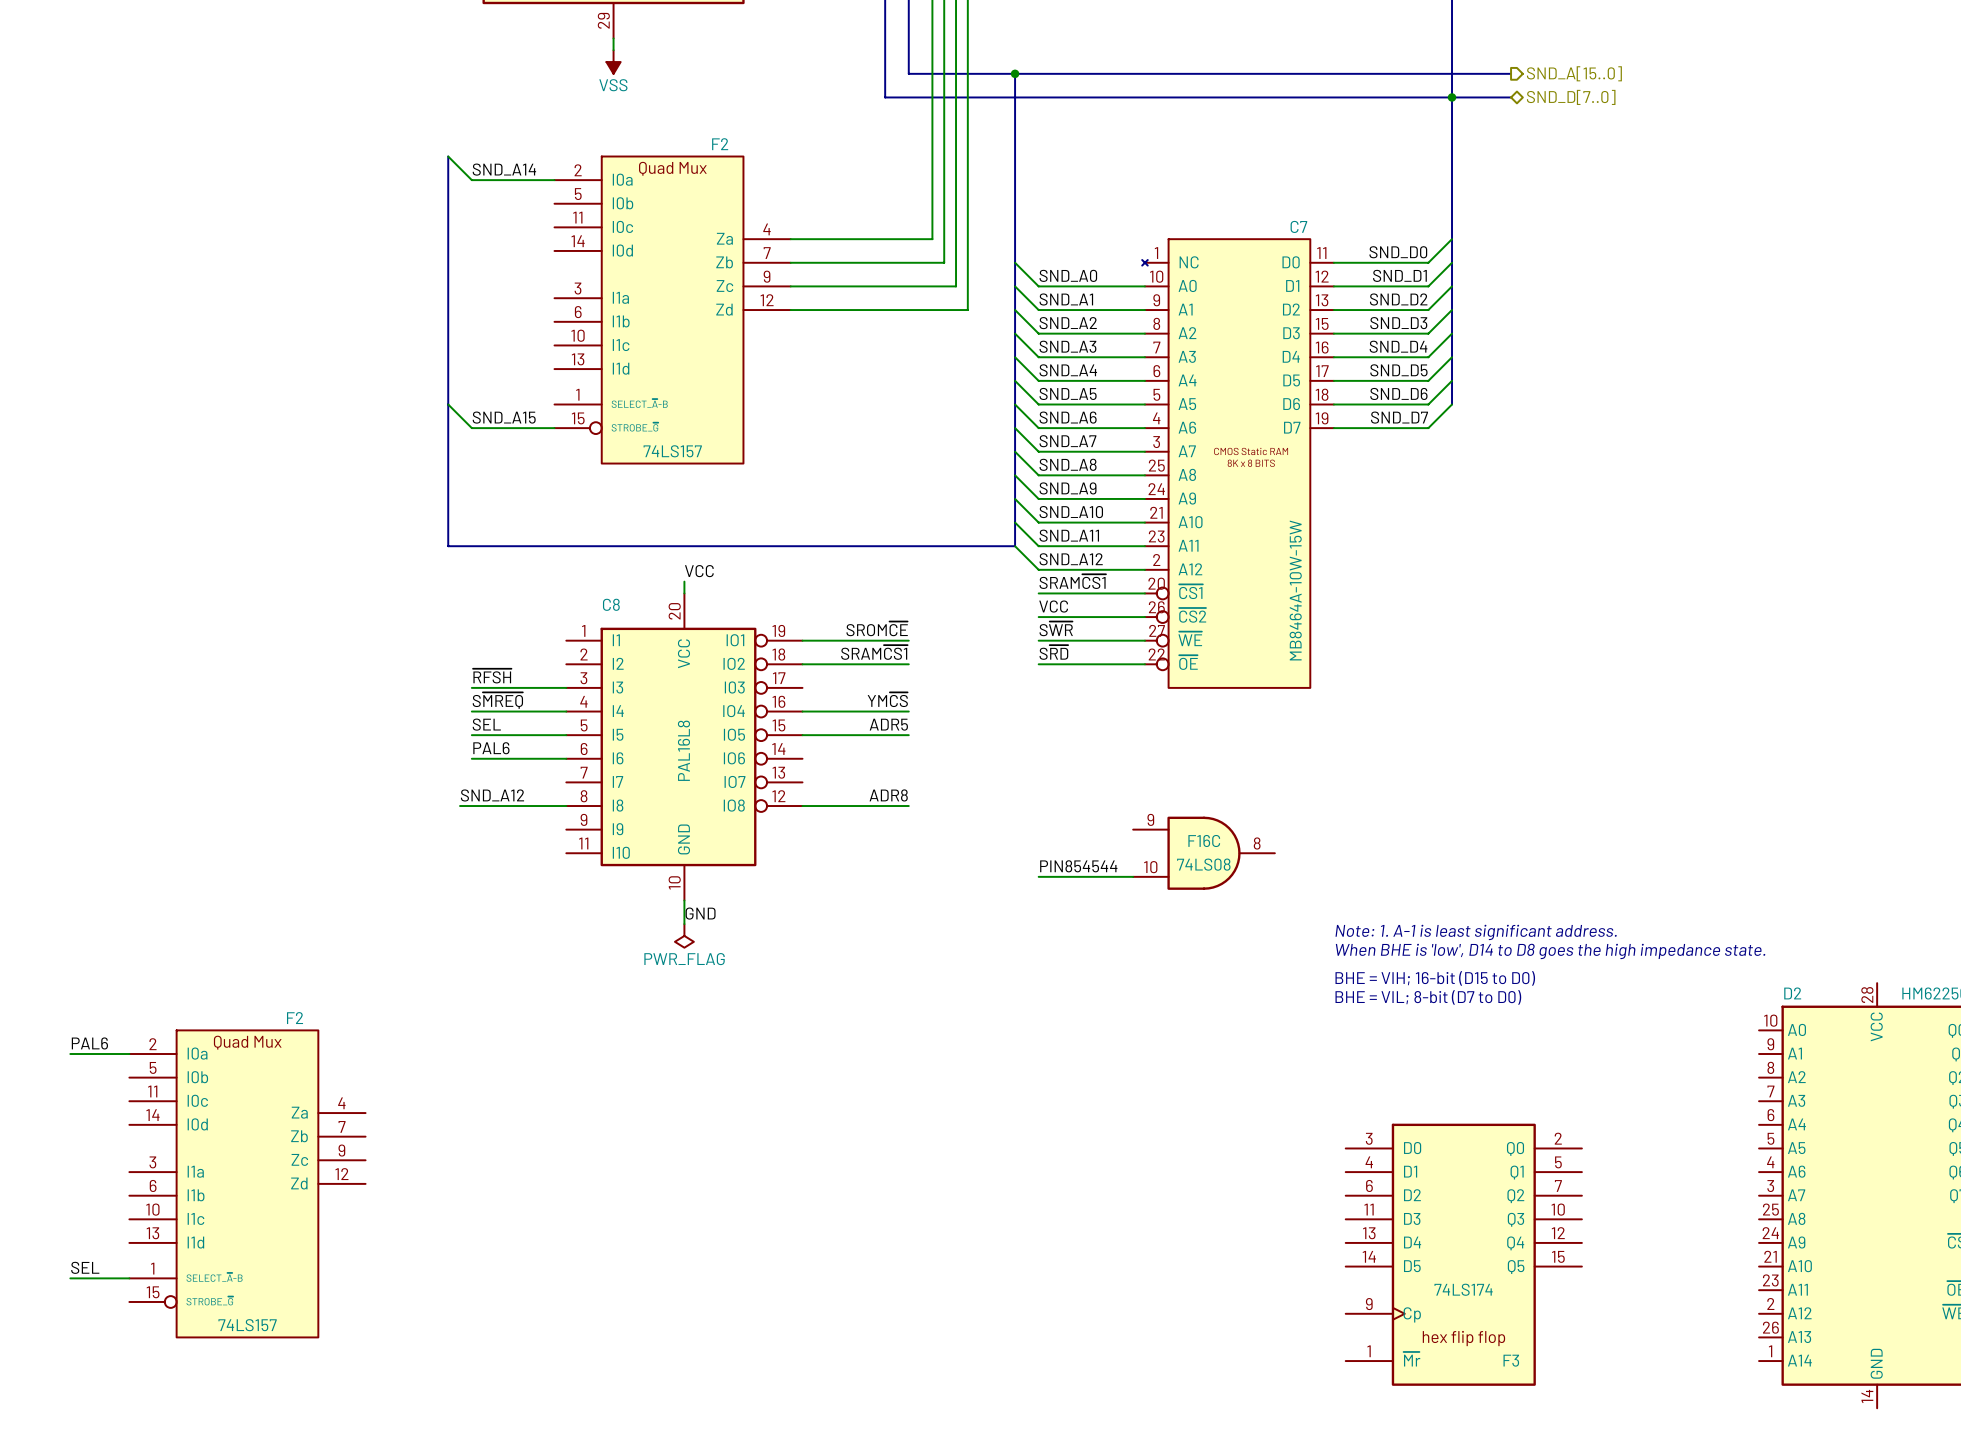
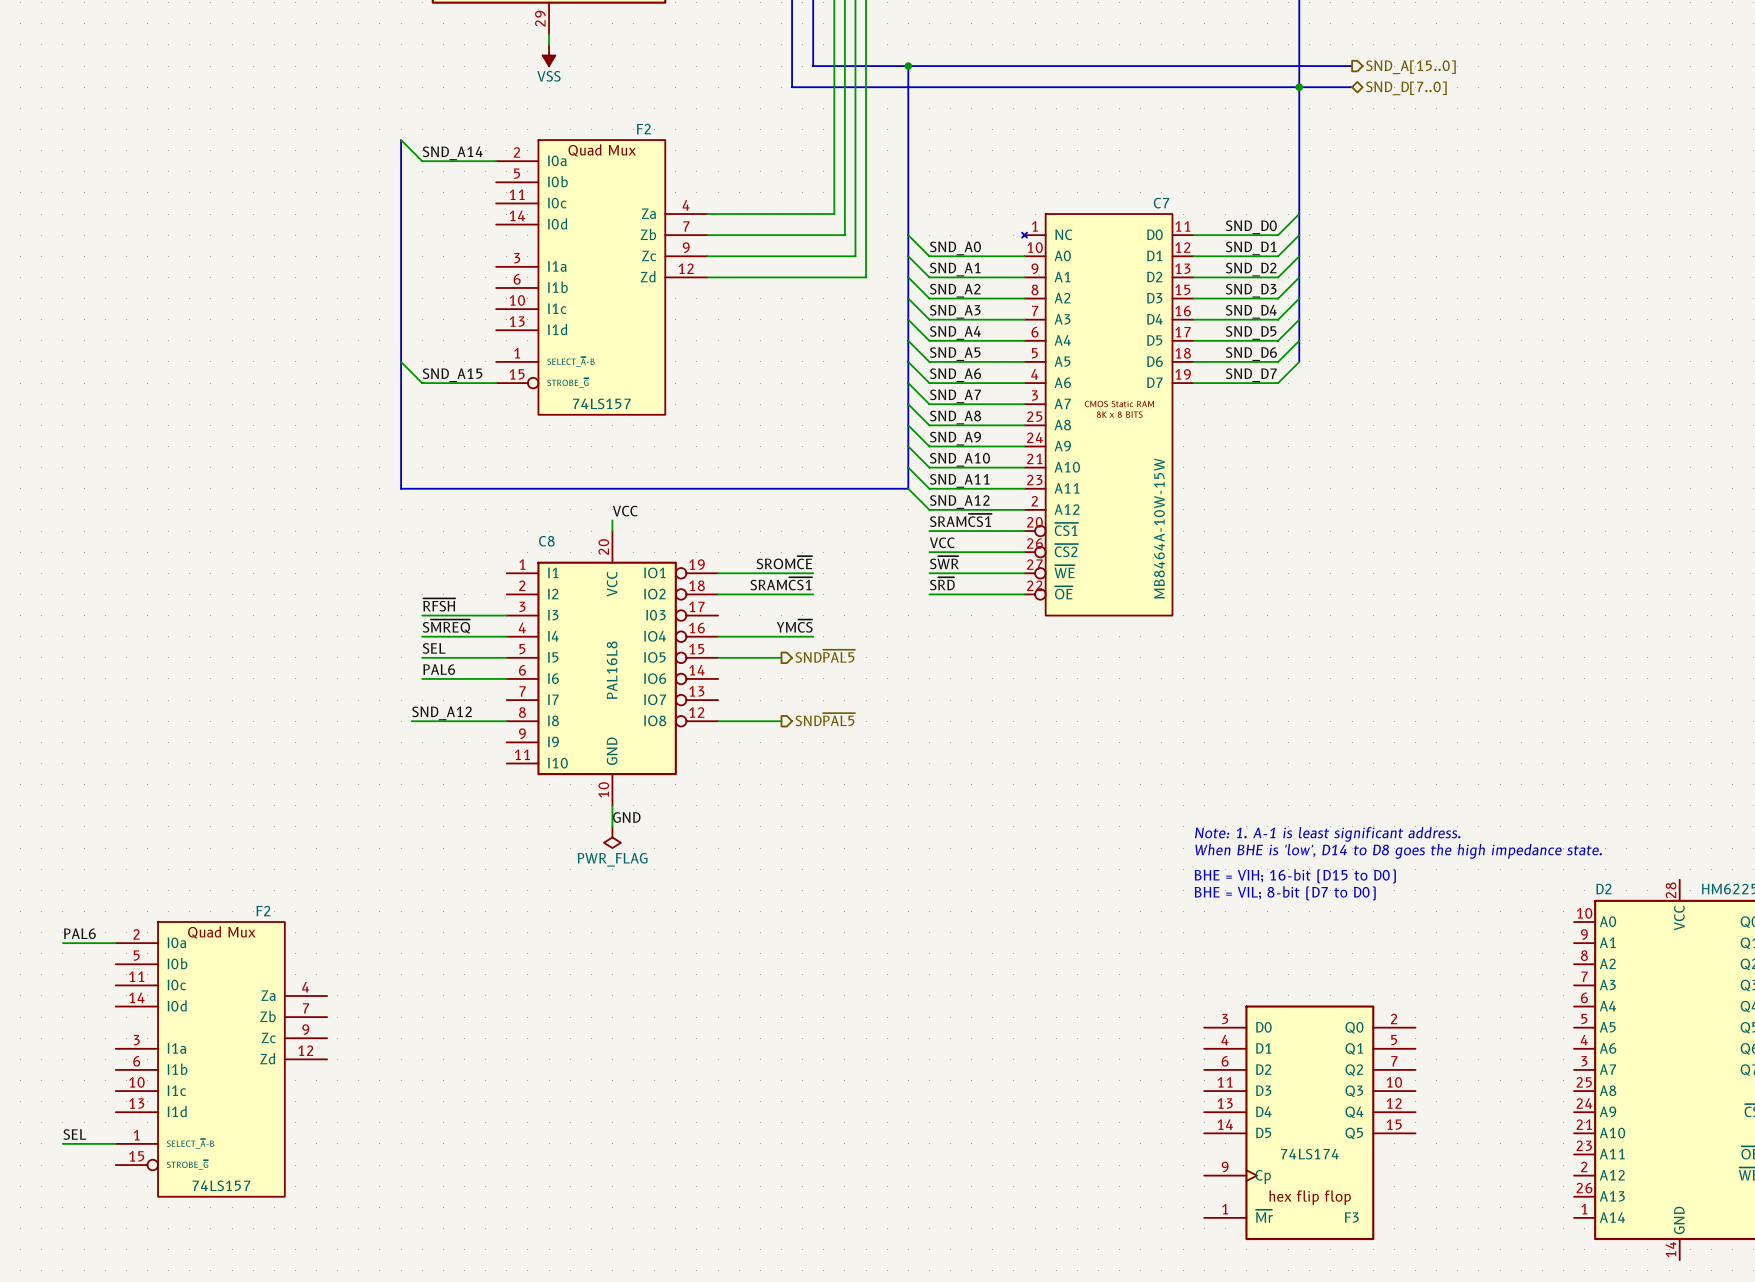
label: ADR5 (888, 724) -> none
hierarchical label: none -> SND~{PAL5} (825, 656)
wire: (873, 735) (908, 735) -> none
label: ADR8 (888, 795) -> none
hierarchical label: none -> SND~{PAL5} (825, 719)
wire: (873, 806) (908, 806) -> none
F16C: 74LS08 (1204, 853) -> none
label: PIN854544 (1078, 866) -> none
wire: (1038, 876) (1133, 876) -> none

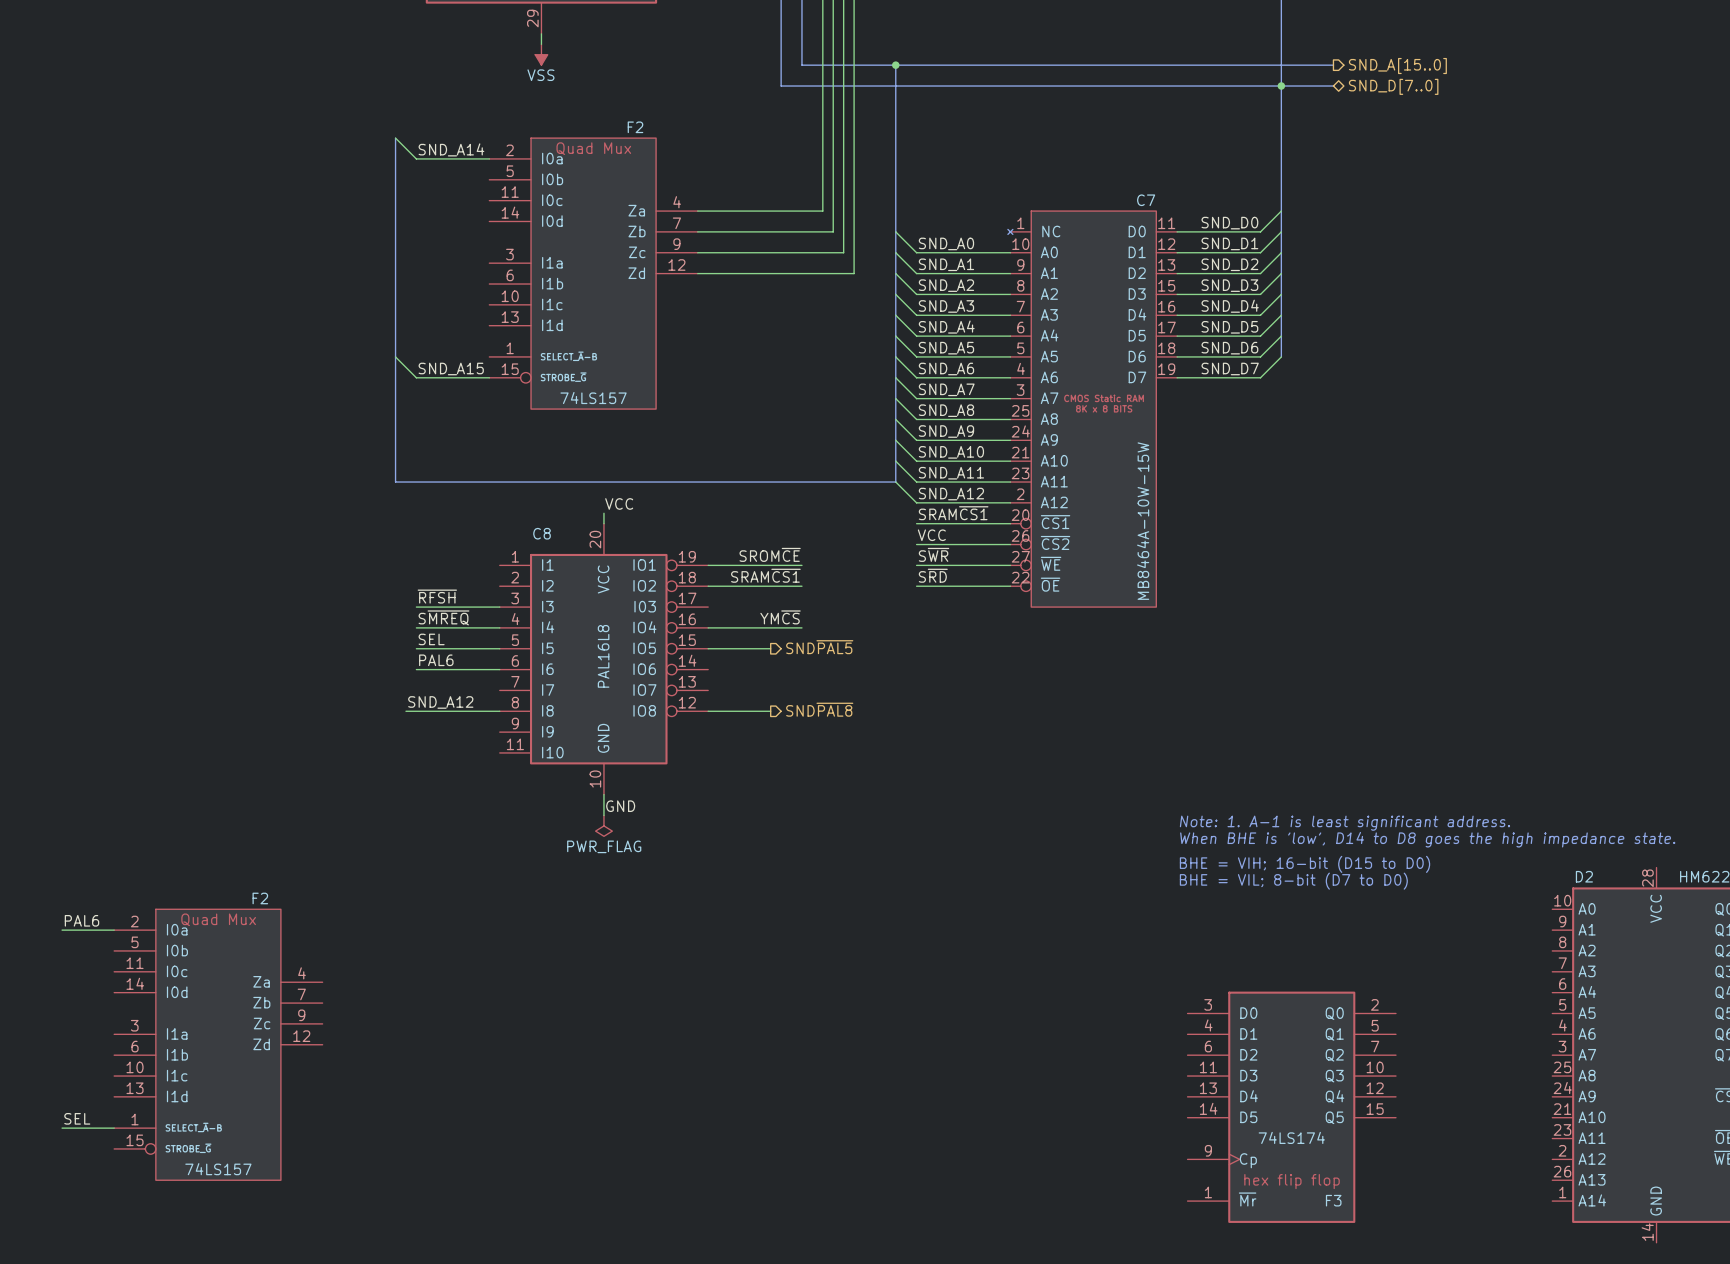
hierarchical label: SND~{PAL5} (825, 719) -> SND~{PAL8} (819, 709)

